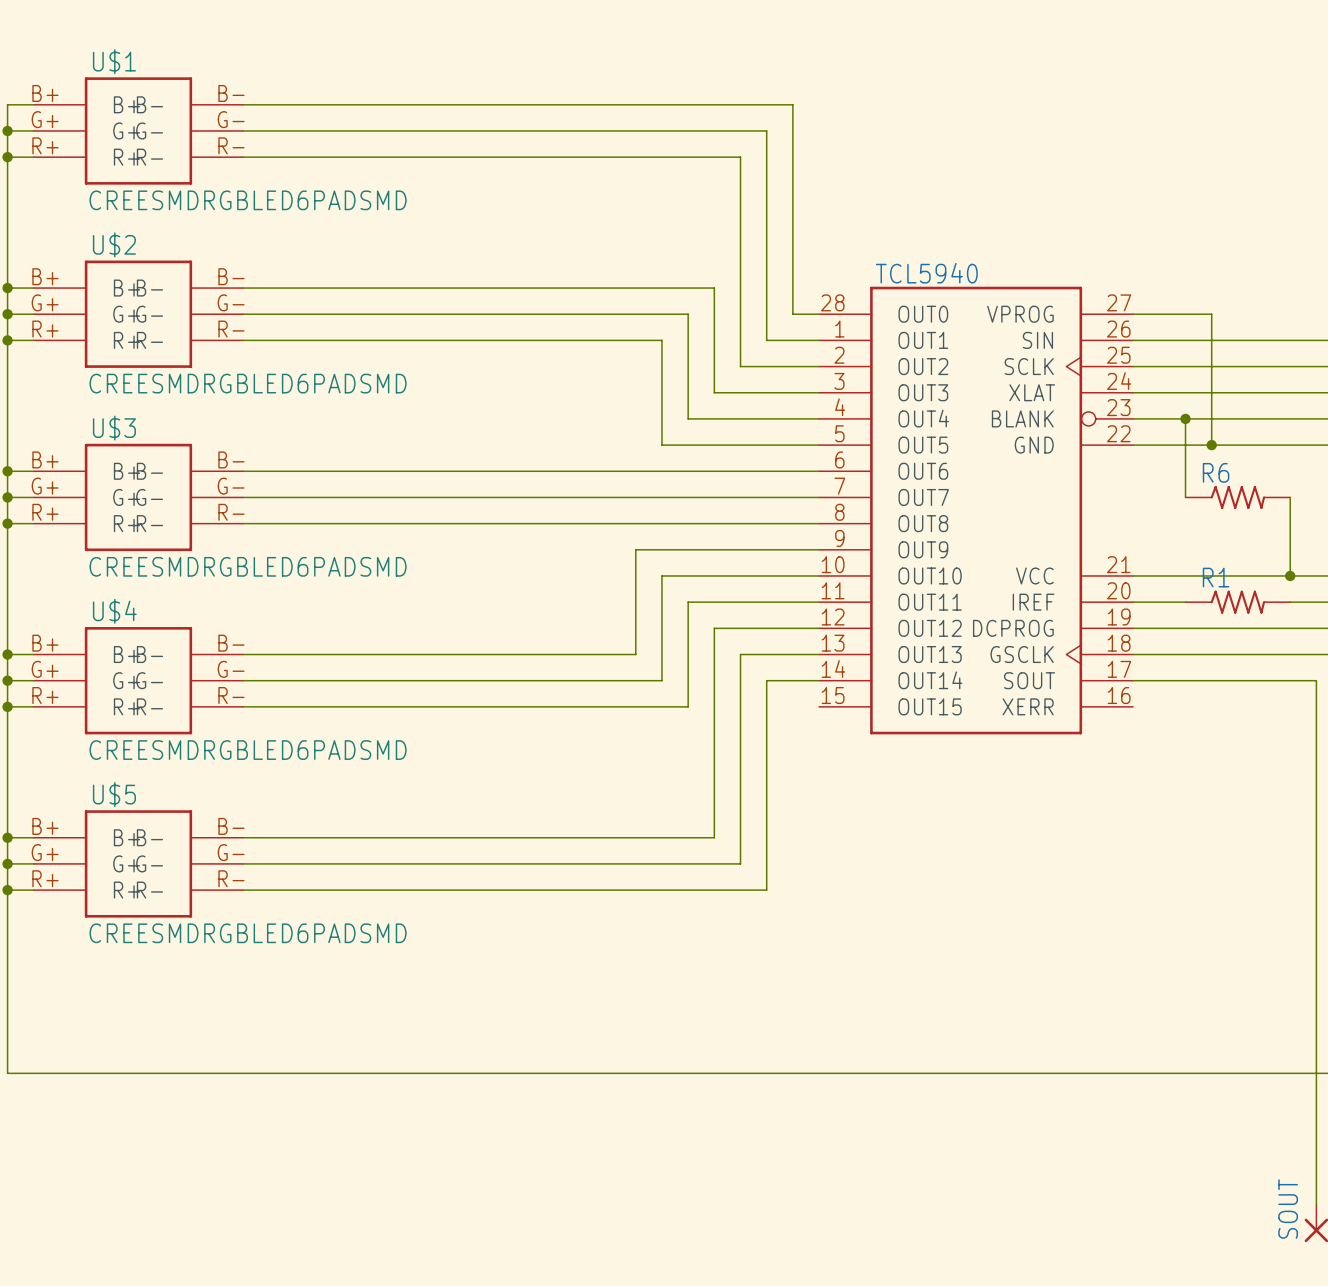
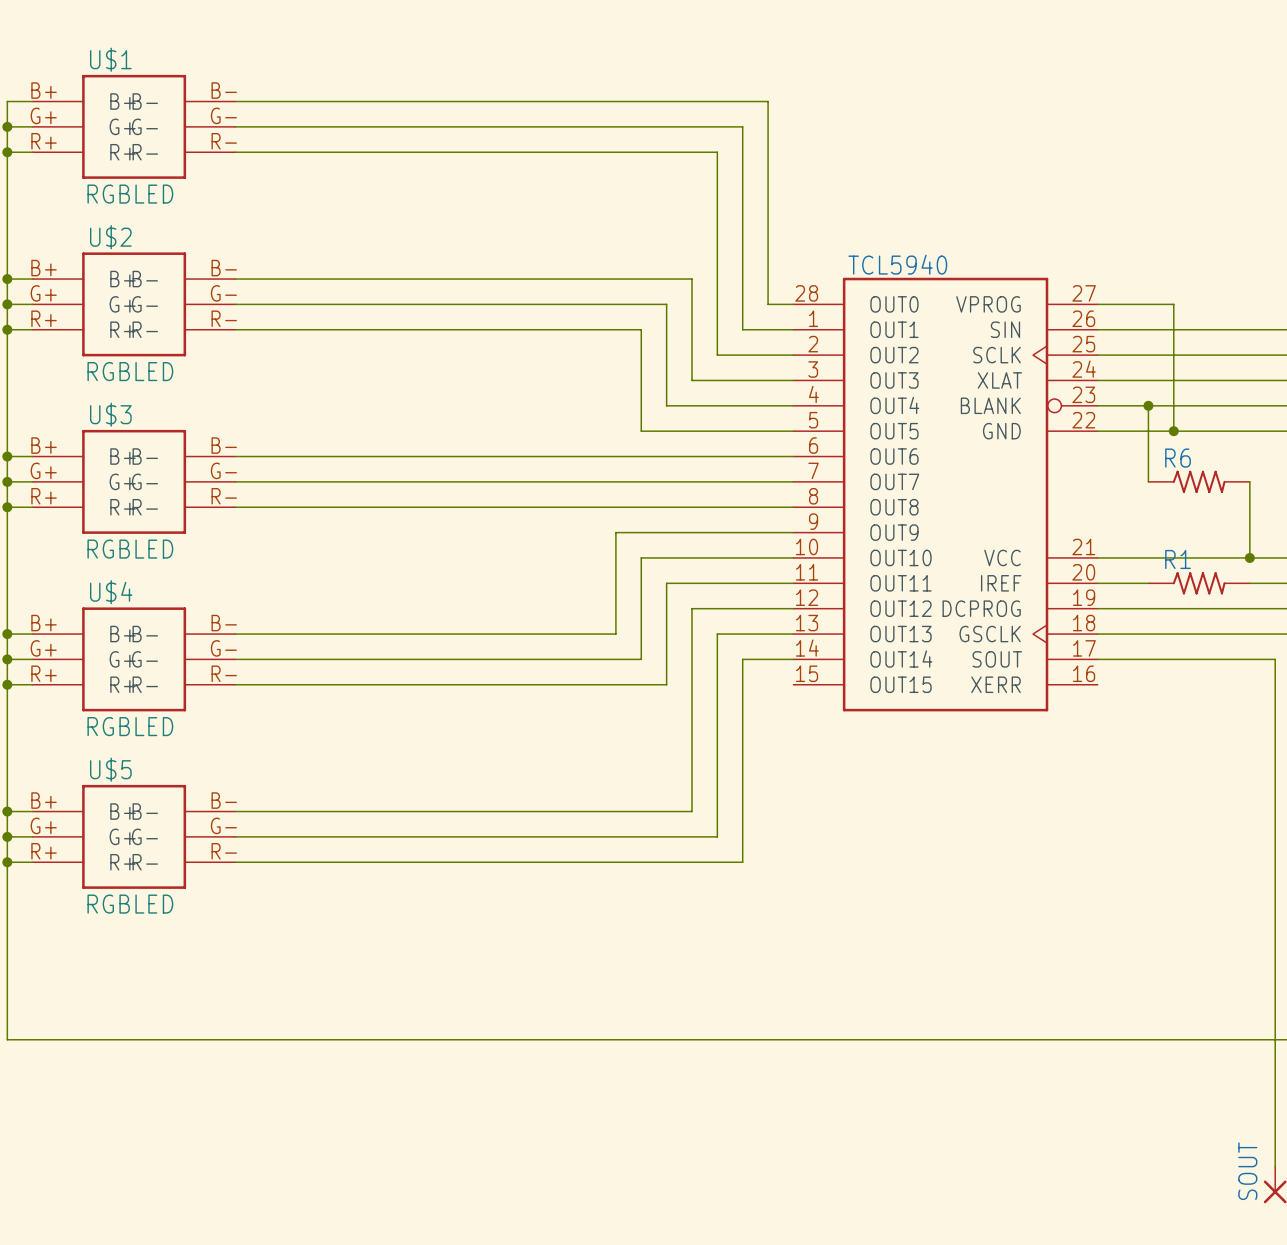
U$1 value: CREESMDRGBLED6PADSMD (248, 200) -> RGBLED (130, 194)
U$2 value: CREESMDRGBLED6PADSMD (248, 383) -> RGBLED (130, 371)
U$3 value: CREESMDRGBLED6PADSMD (248, 566) -> RGBLED (130, 549)
U$4 value: CREESMDRGBLED6PADSMD (248, 750) -> RGBLED (130, 726)
U$5 value: CREESMDRGBLED6PADSMD (248, 933) -> RGBLED (130, 904)

